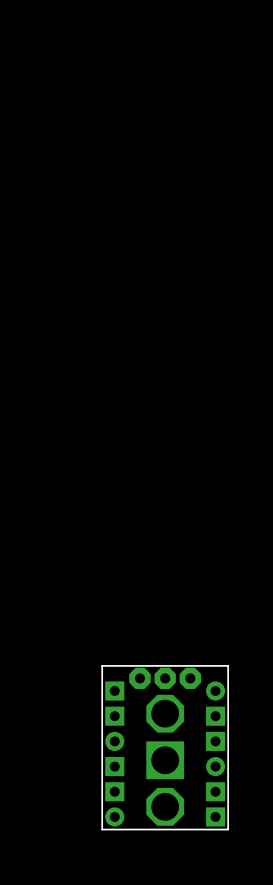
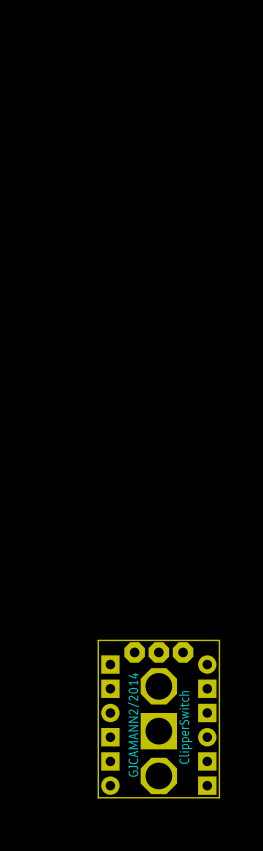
text: none -> GJCAMANN2/2014 (133, 724)
text: none -> ClipperSwitch (185, 727)

